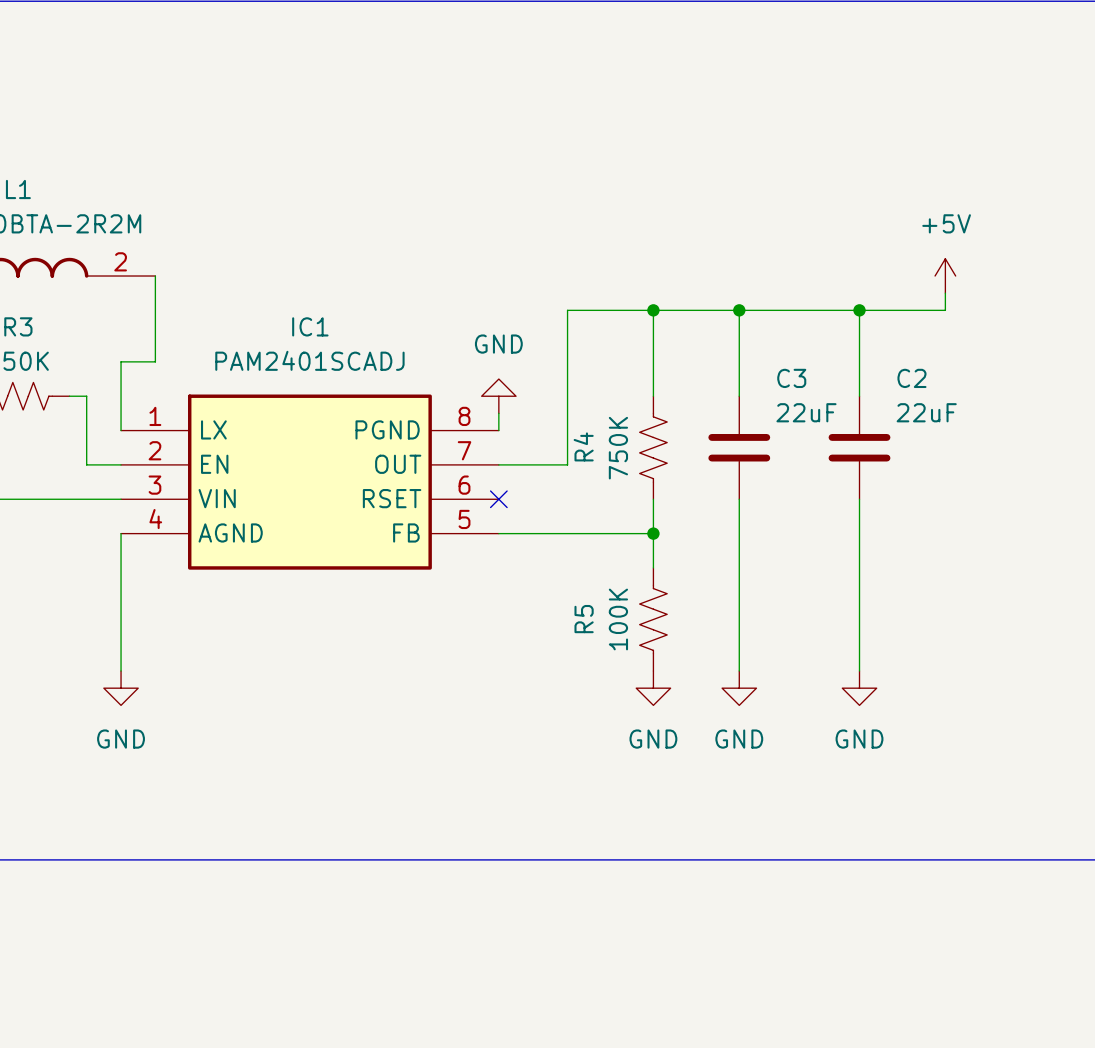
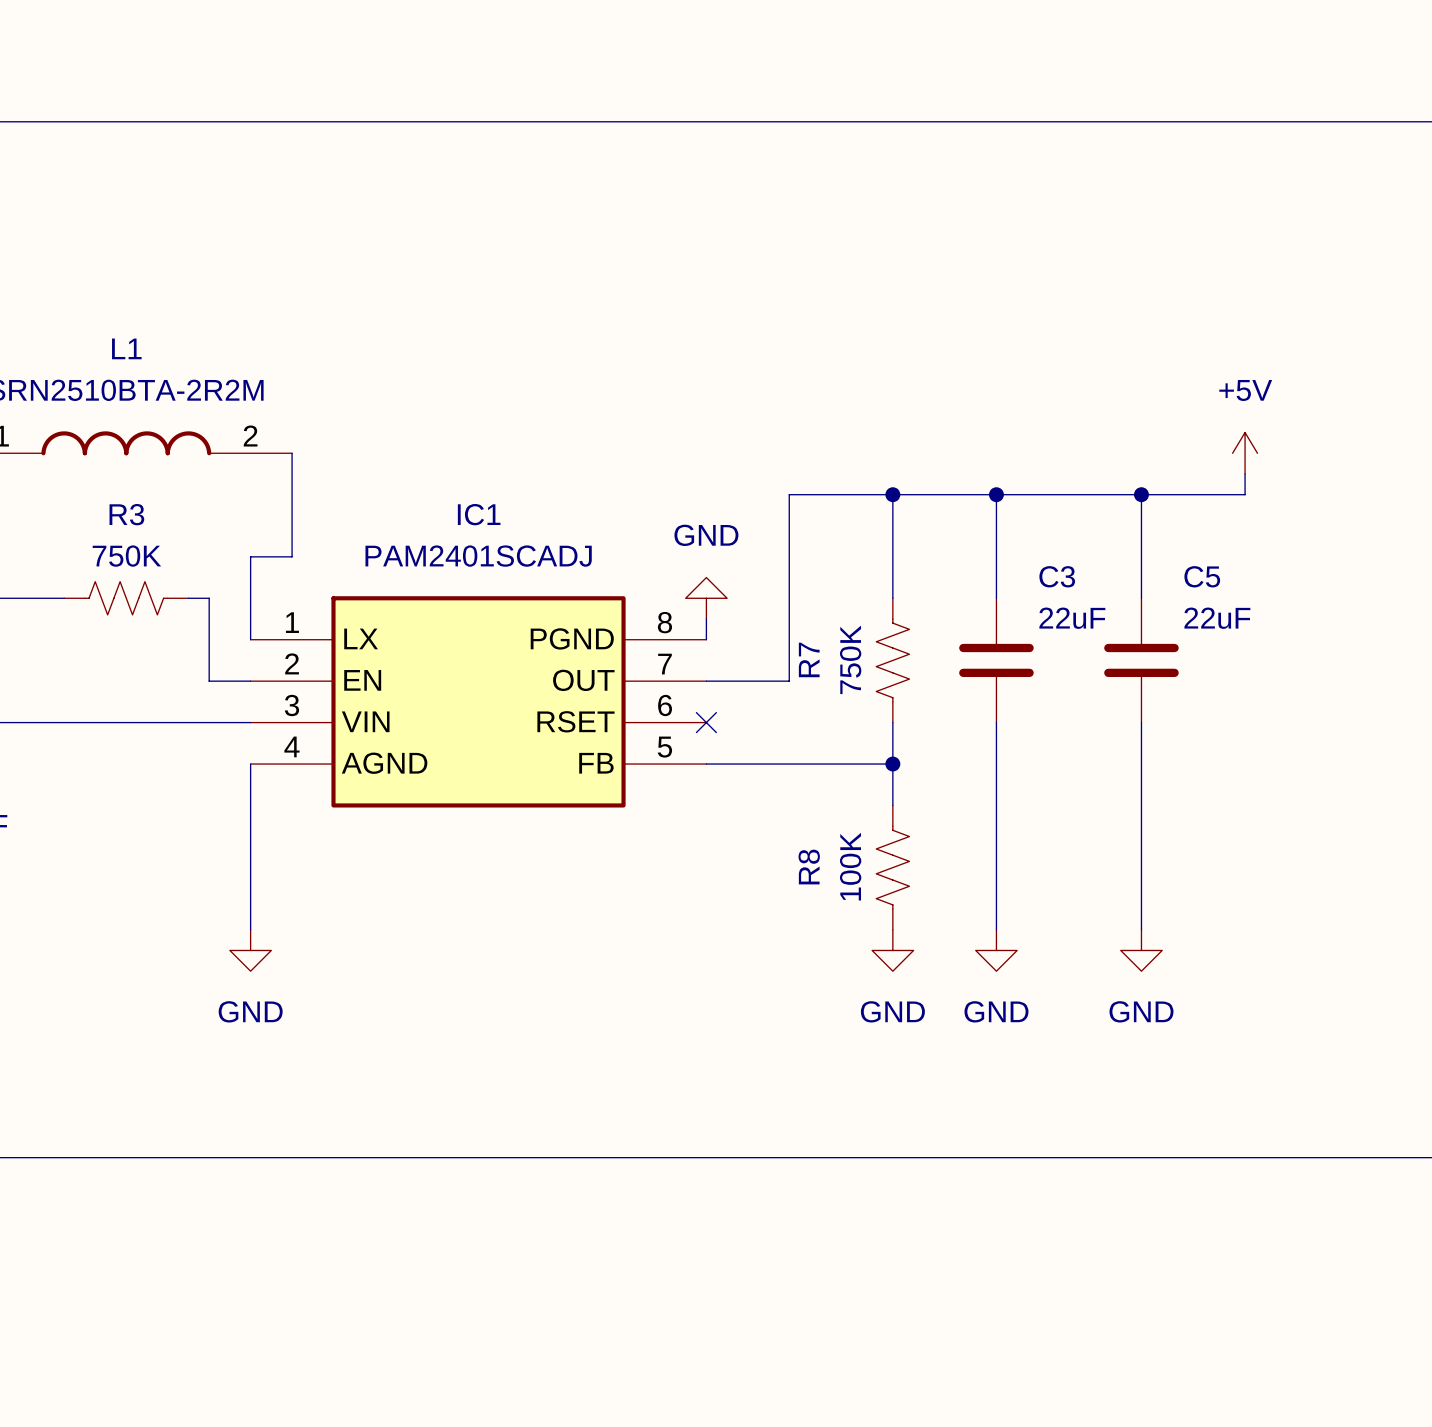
C2 name: C2 (911, 378) -> C5 (1202, 576)
R4 name: R4 (583, 446) -> R7 (809, 659)
R5 name: R5 (584, 619) -> R8 (809, 867)

